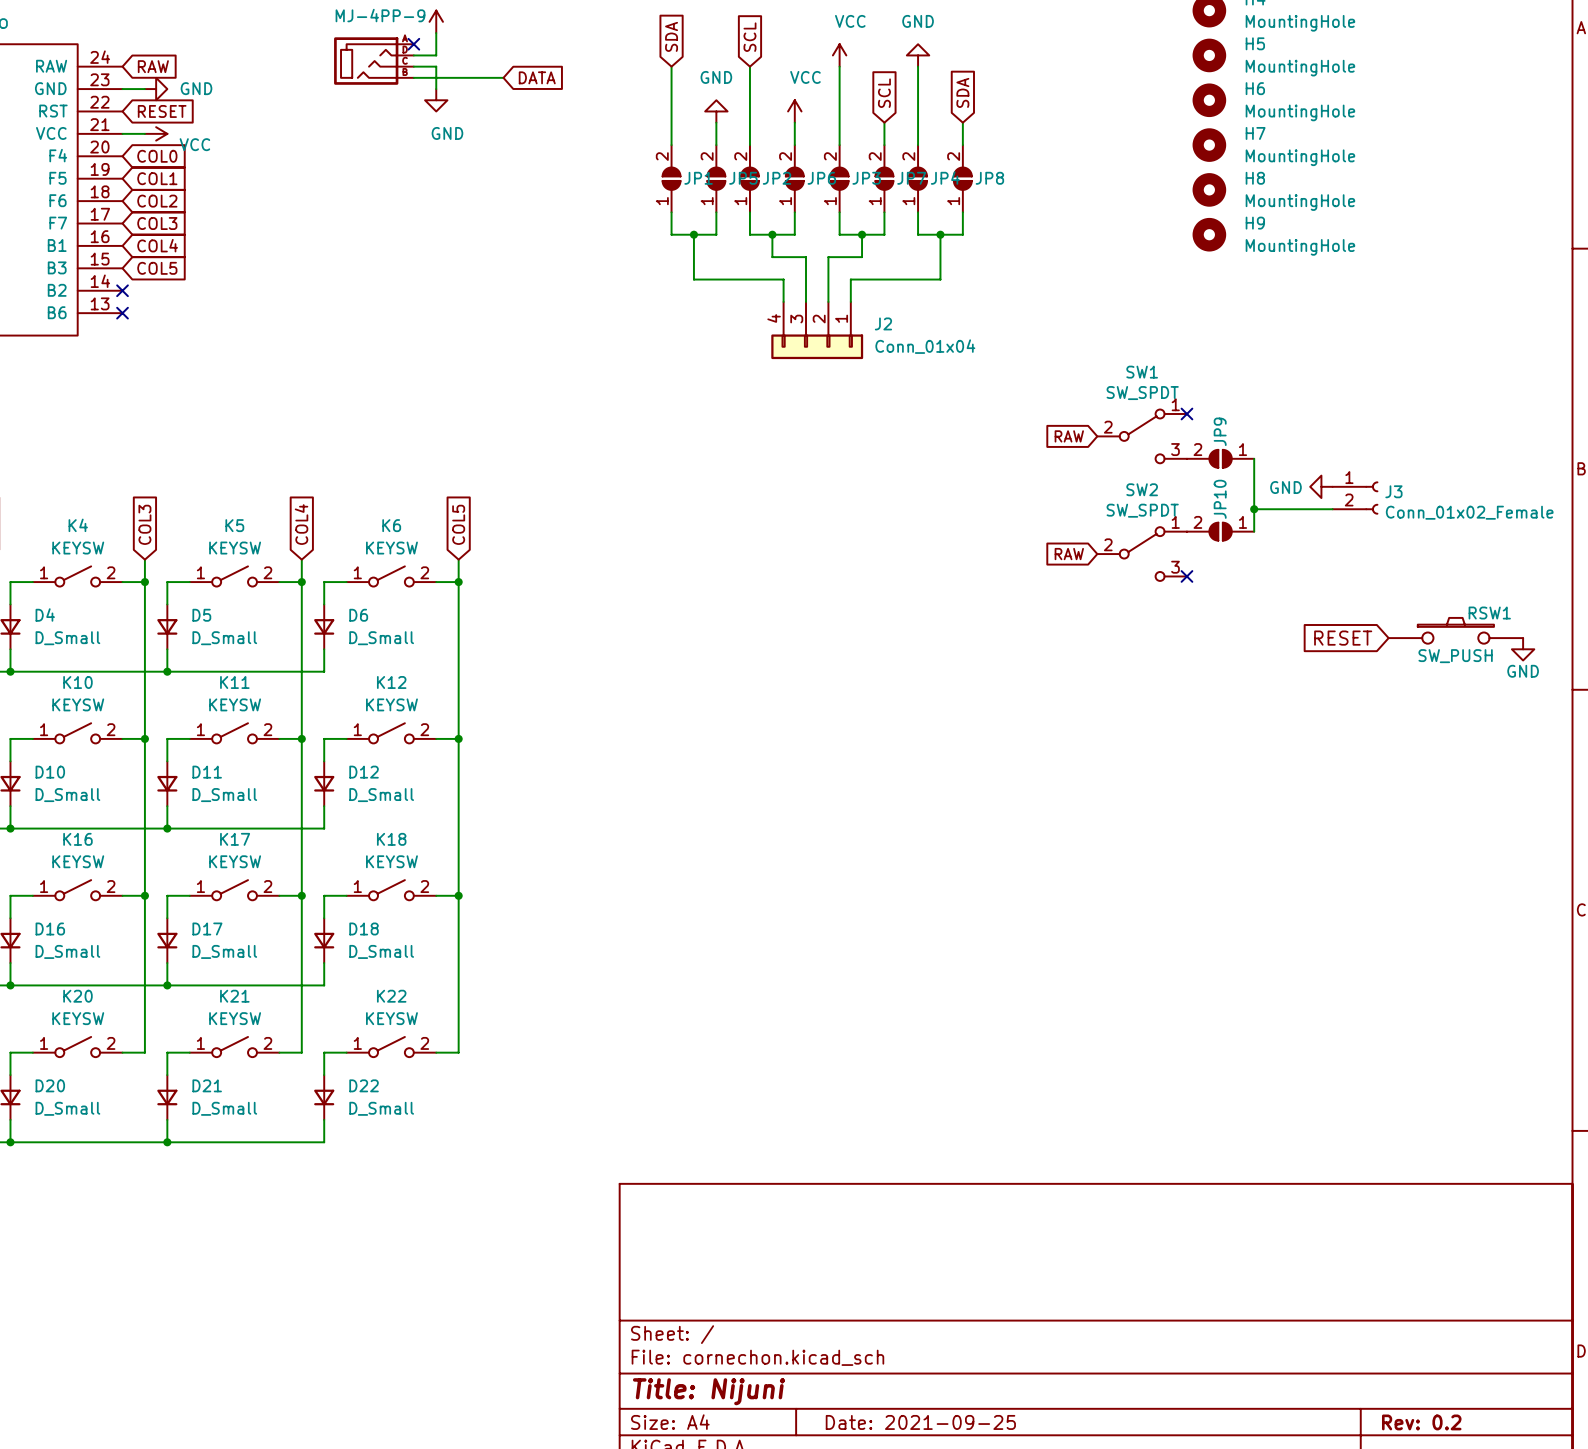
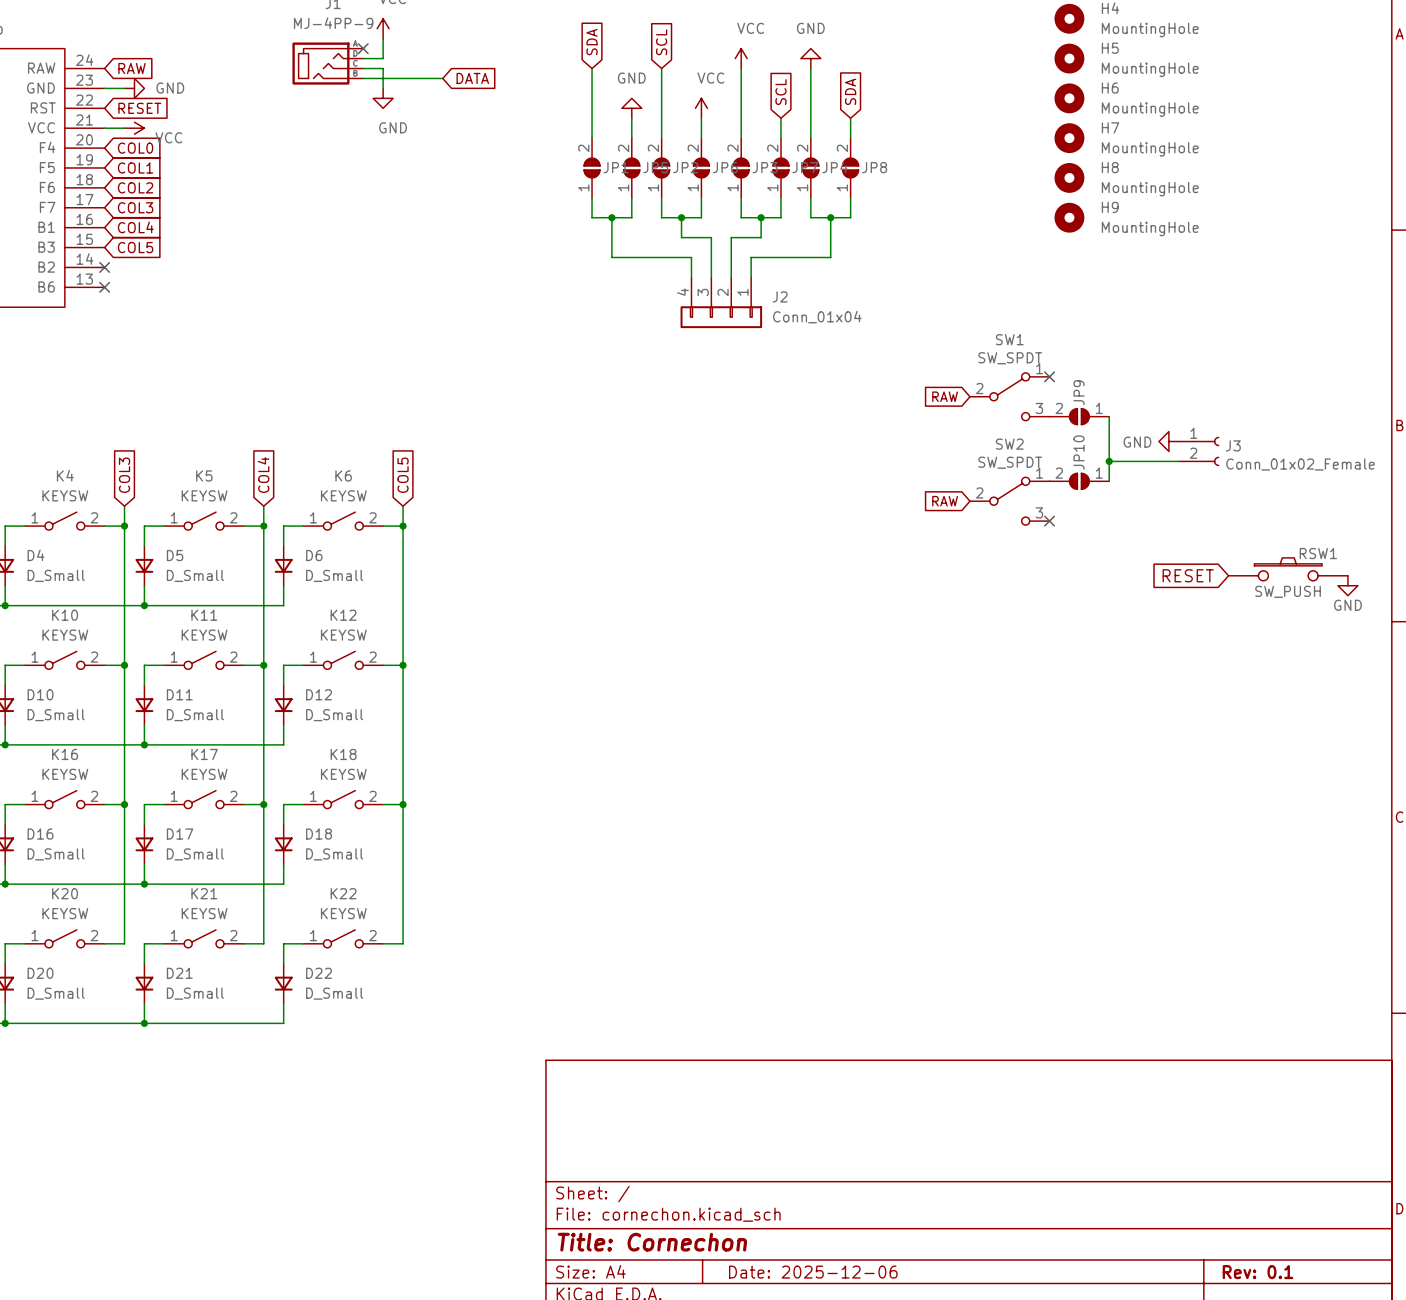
title block: Title: Nijuni (709, 1391) -> Title: Cornechon (652, 1242)
title block: Date: 2021-09-25 (920, 1422) -> Date: 2025-12-06 (813, 1272)
title block: Rev: 0.2 (1421, 1422) -> Rev: 0.1 (1257, 1272)

